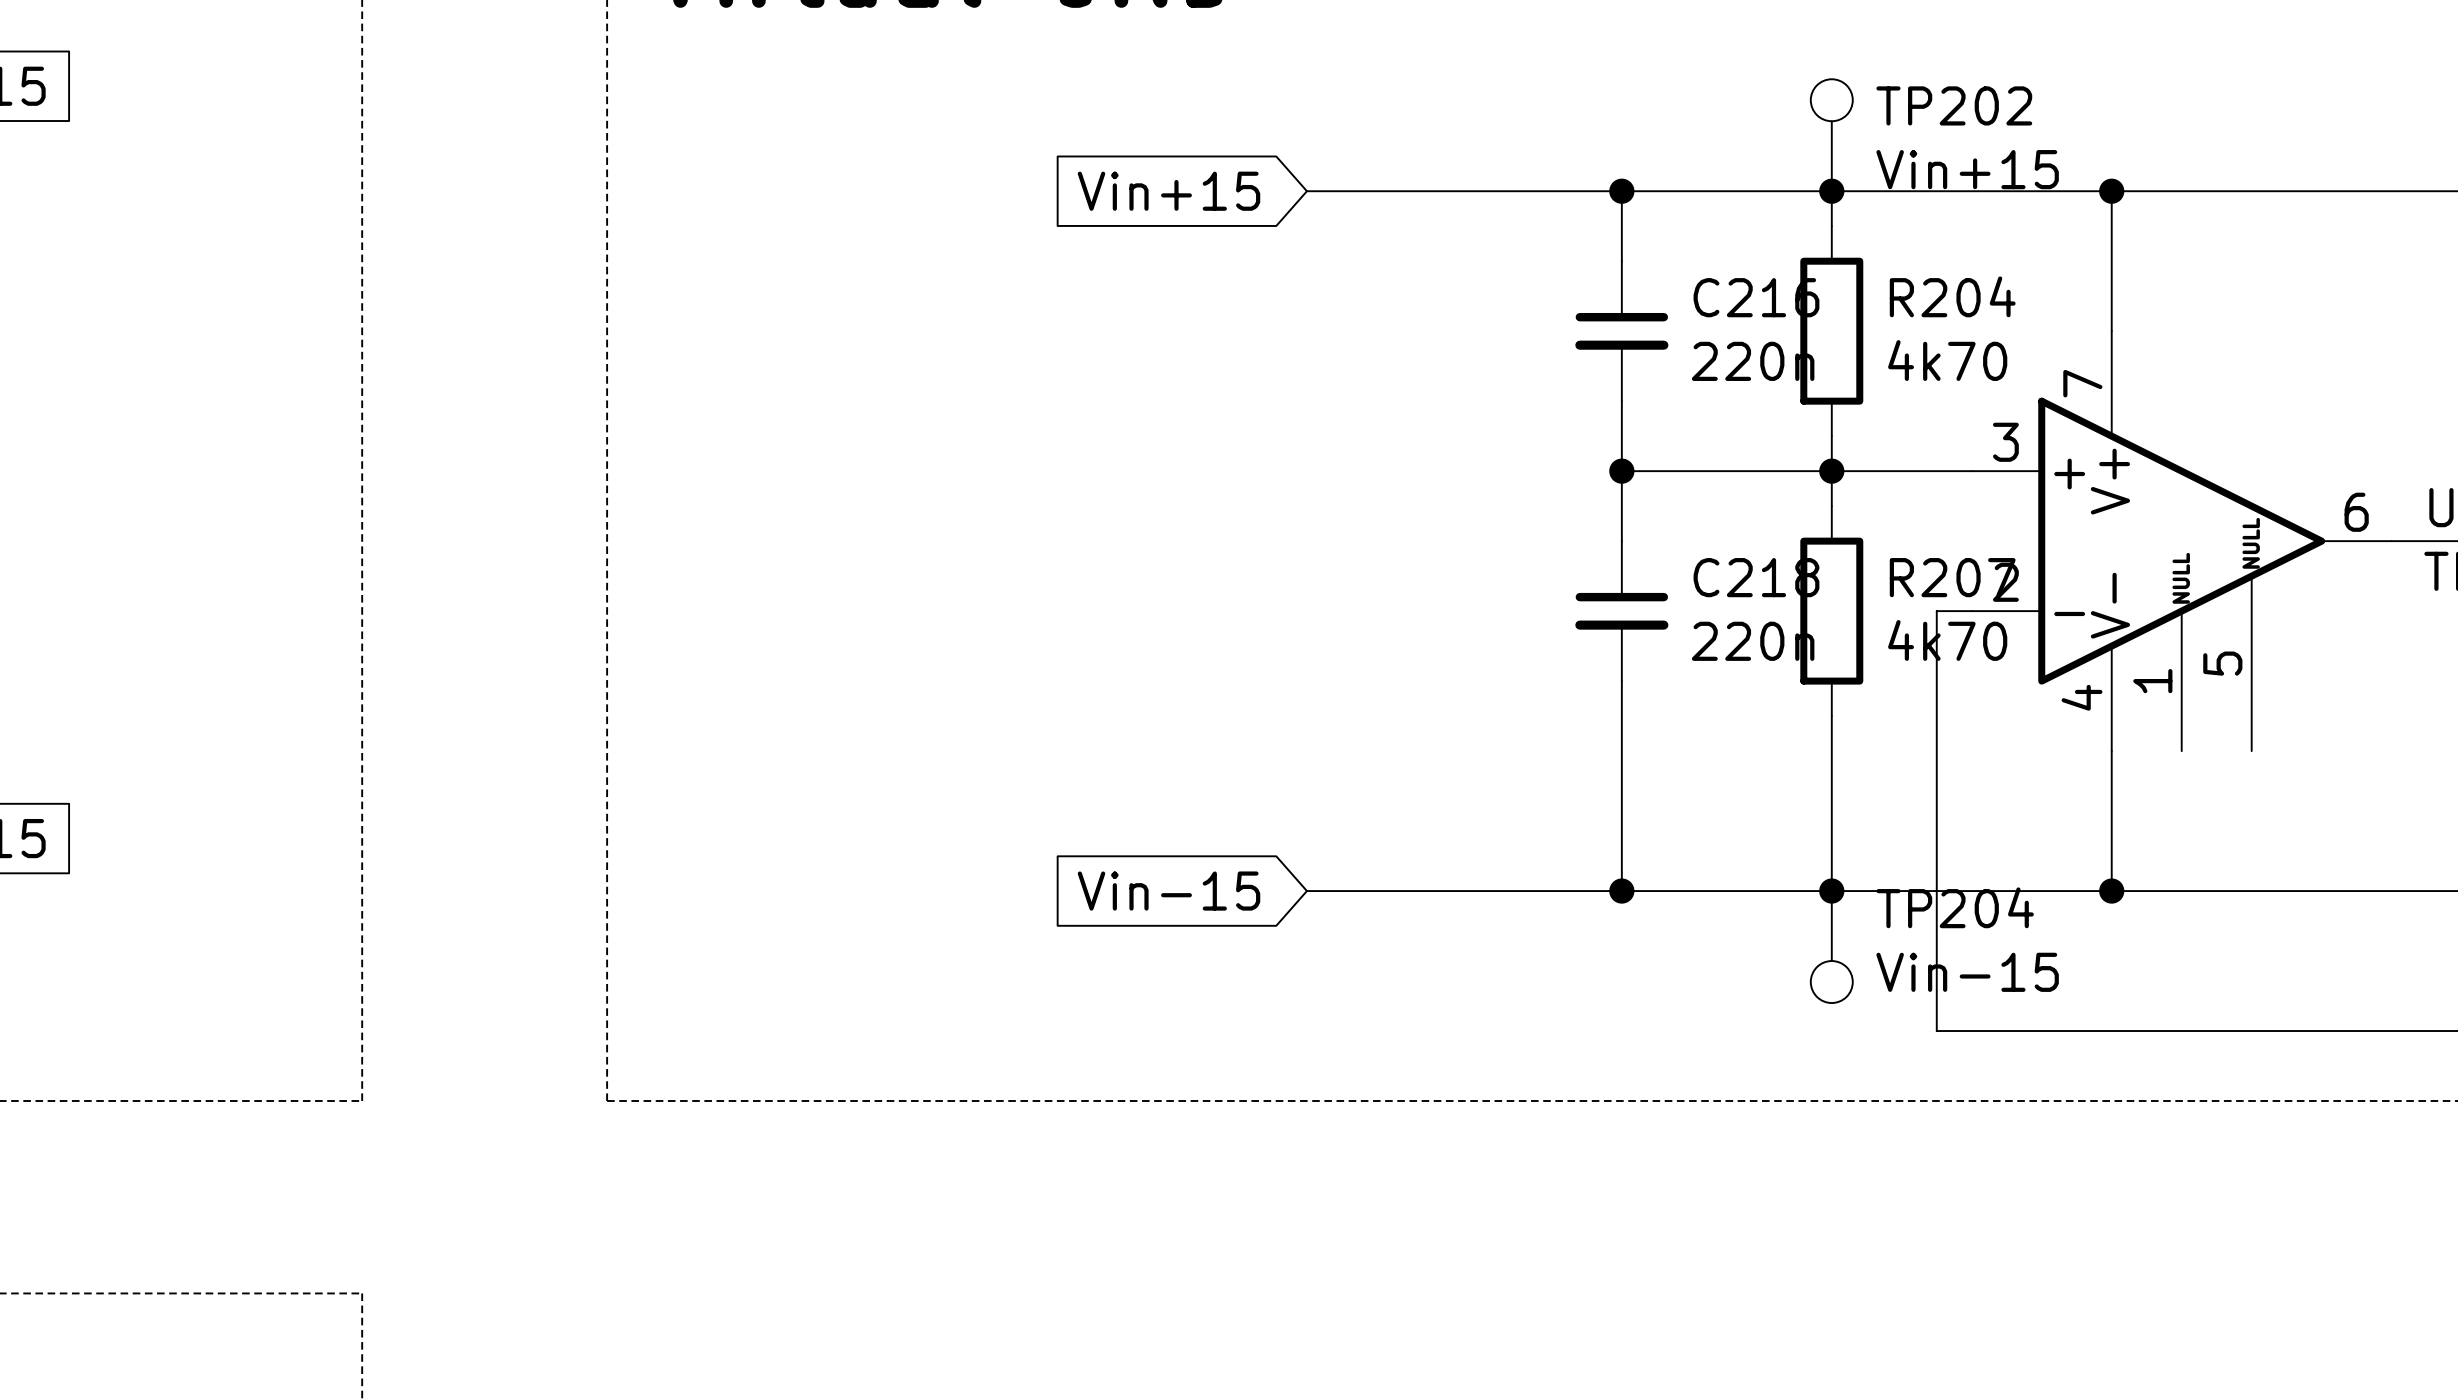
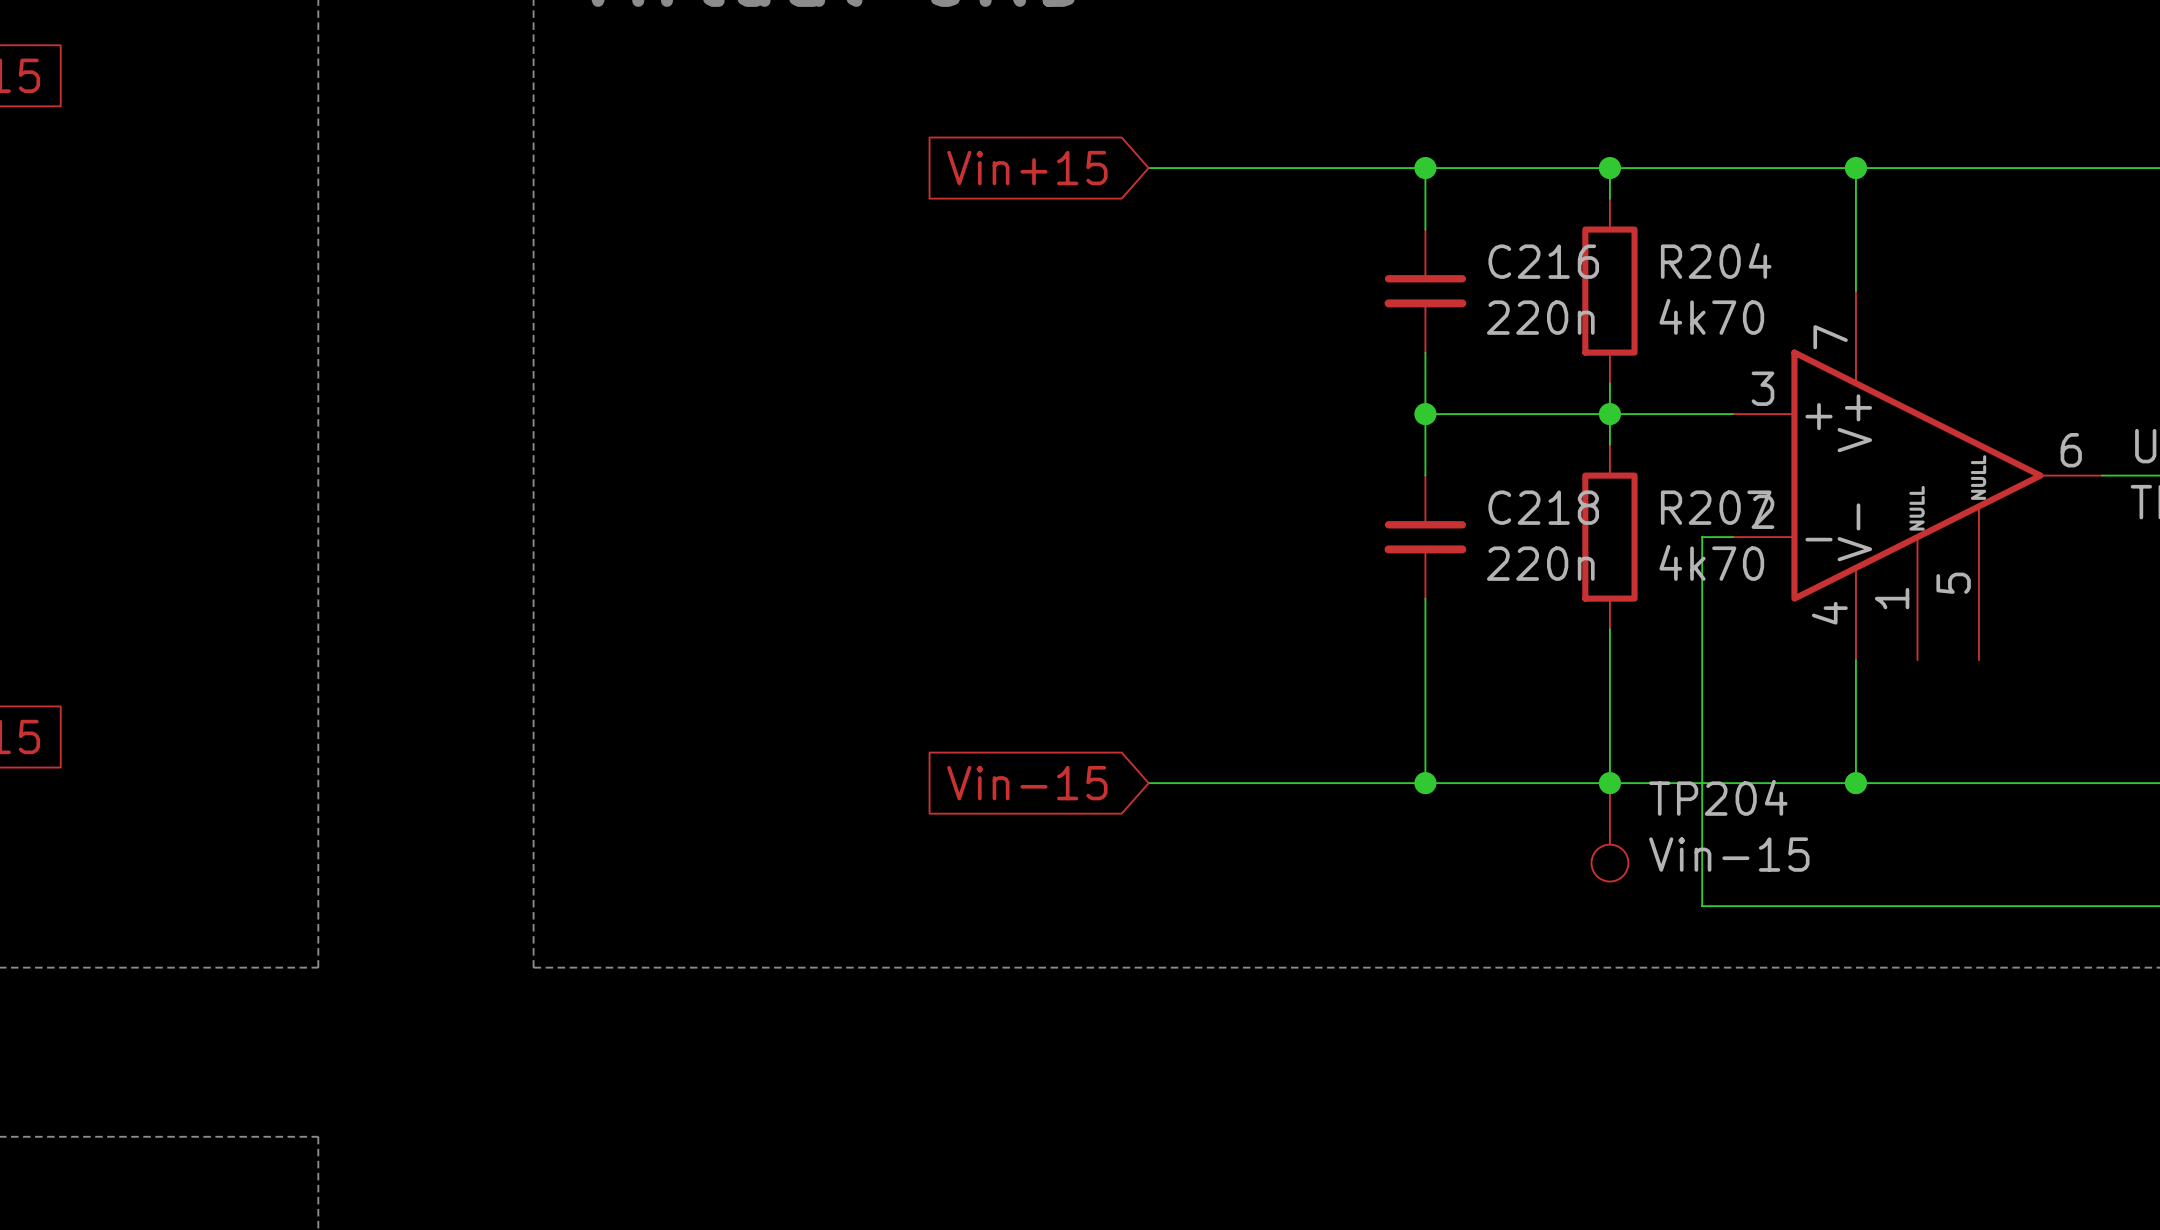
TP202: Vin+15 (1831, 135) -> none

